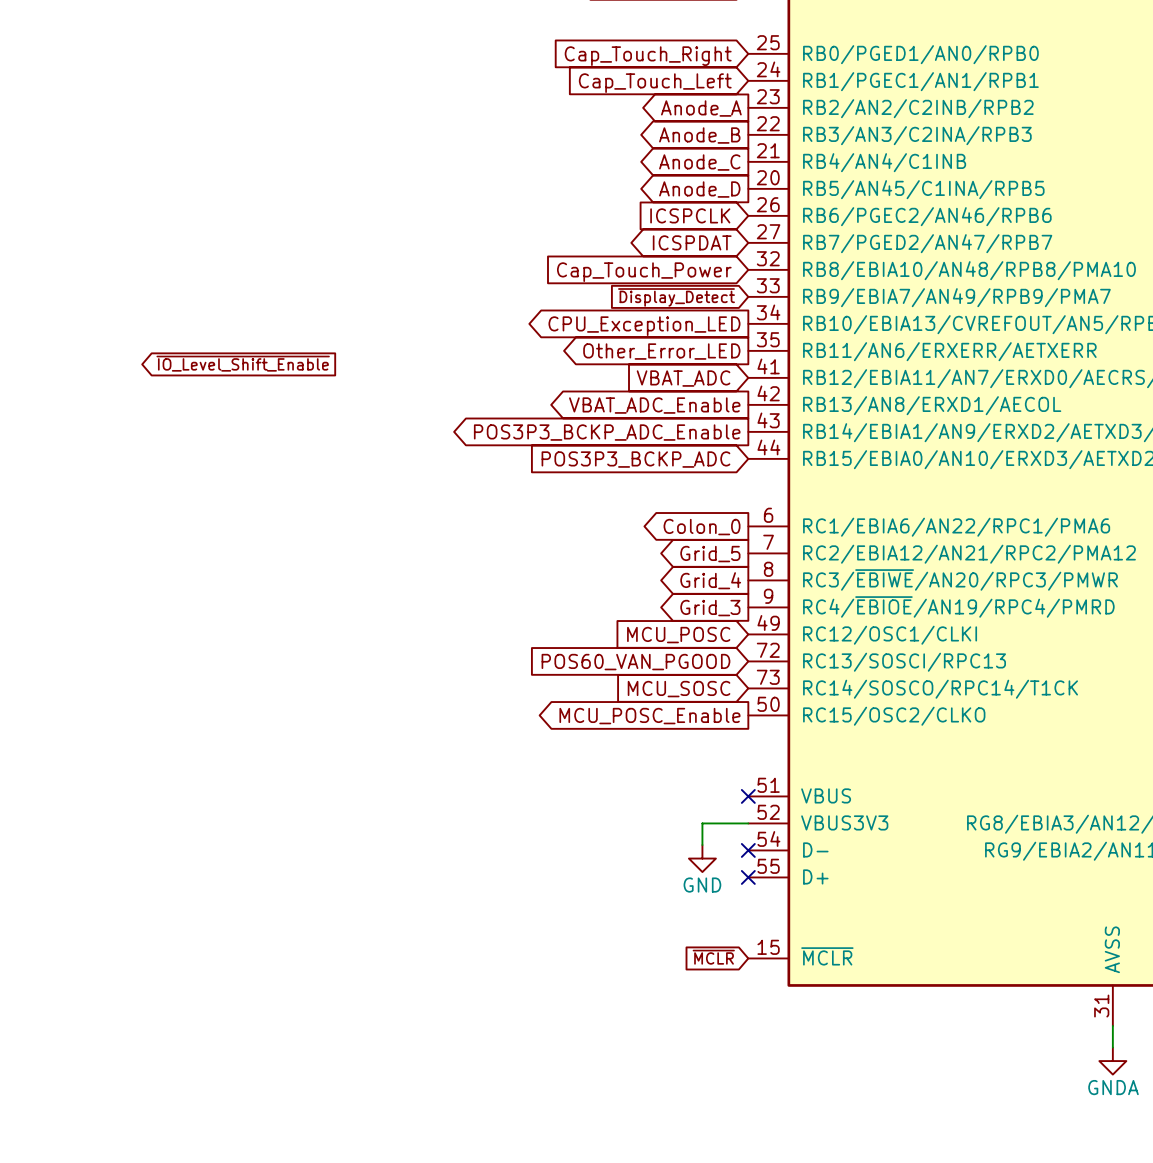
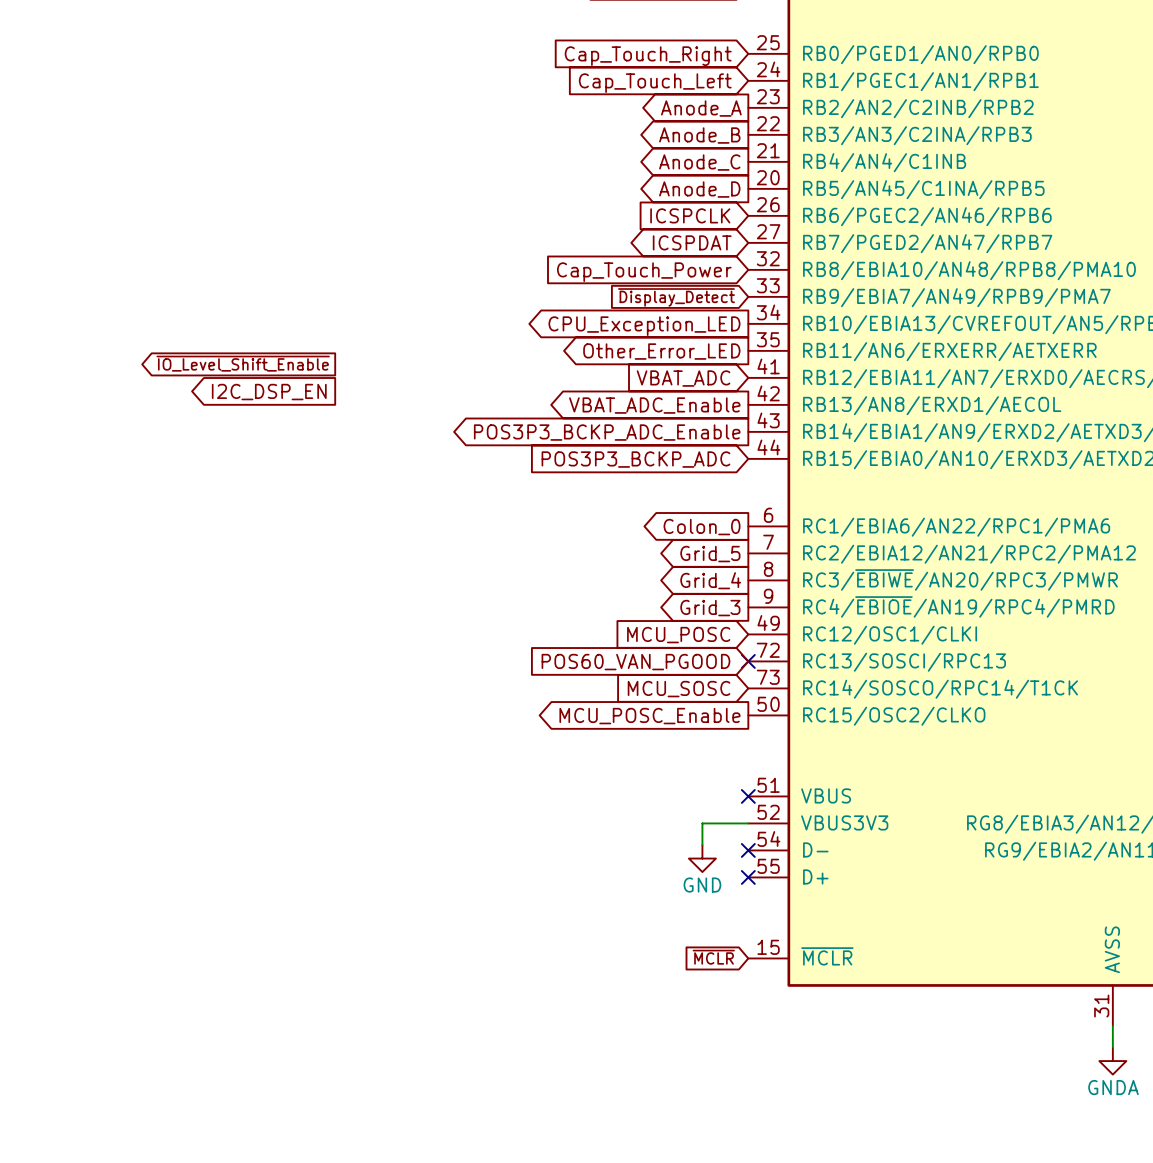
global label: none -> I2C_DSP_EN (269, 392)
no-connect mark: none -> (748, 661)

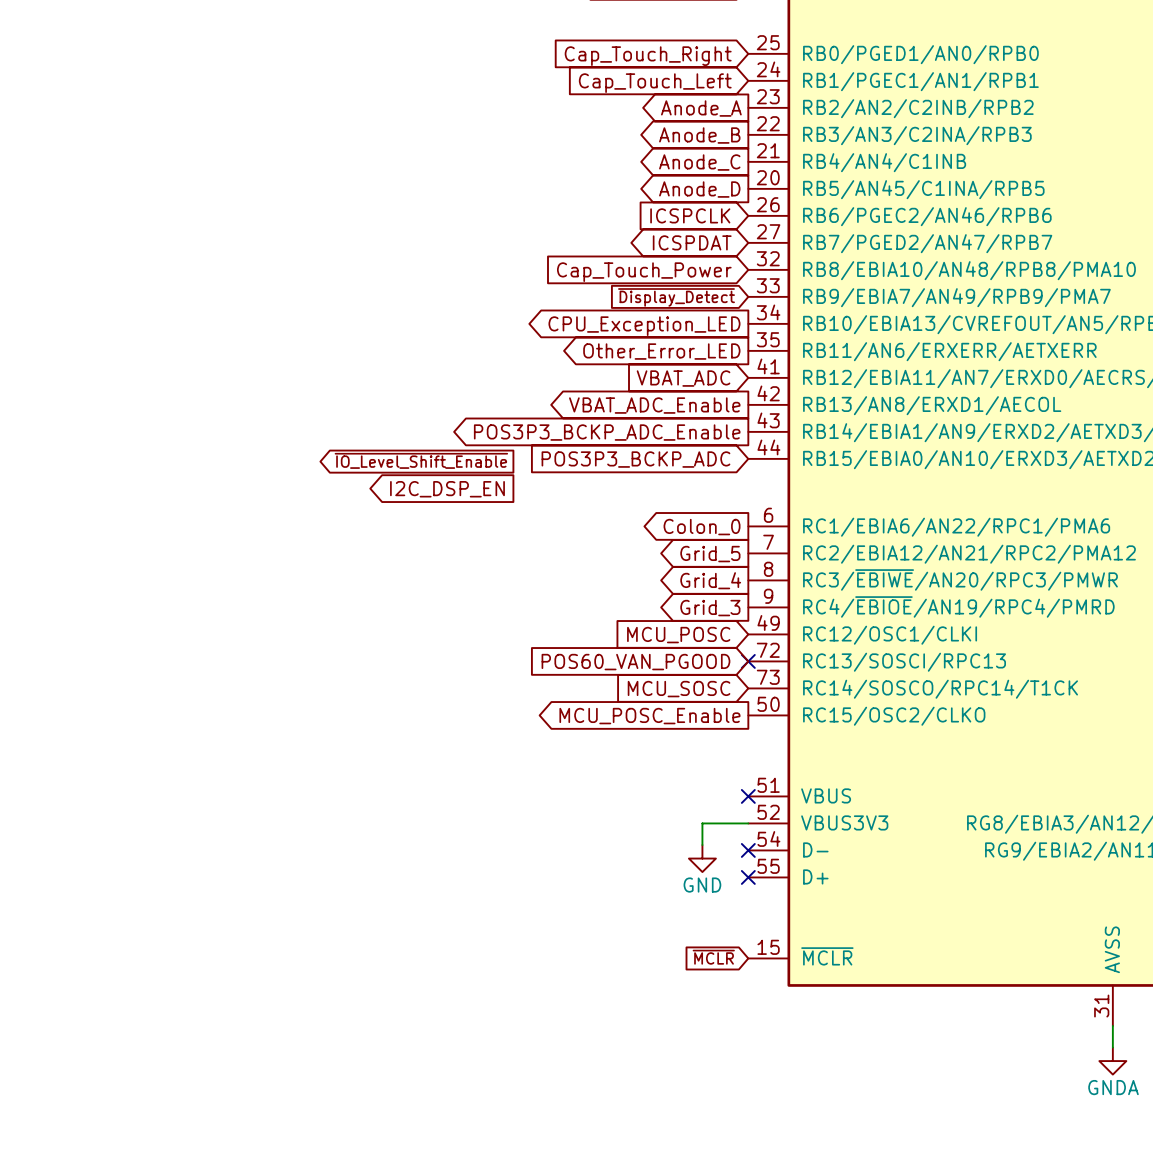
global label position: ~{IO_Level_Shift_Enable} (243, 363) -> ~{IO_Level_Shift_Enable} (421, 460)
global label position: I2C_DSP_EN (269, 392) -> I2C_DSP_EN (447, 489)

